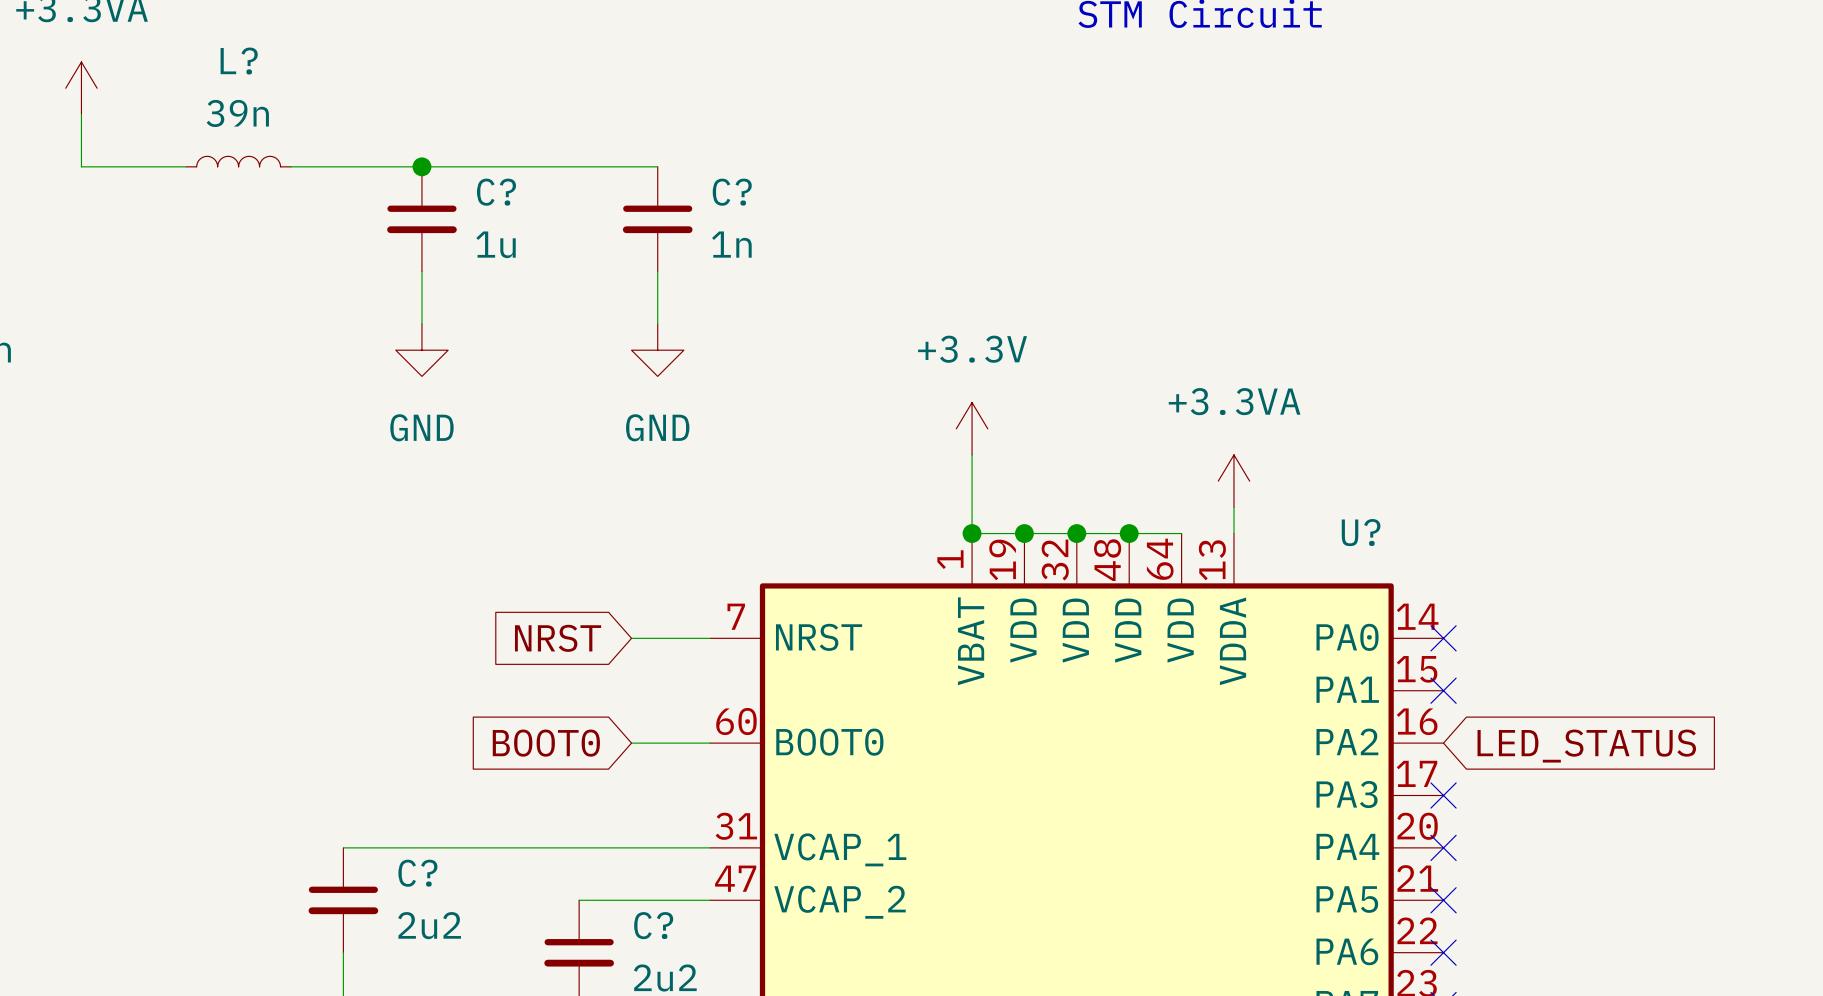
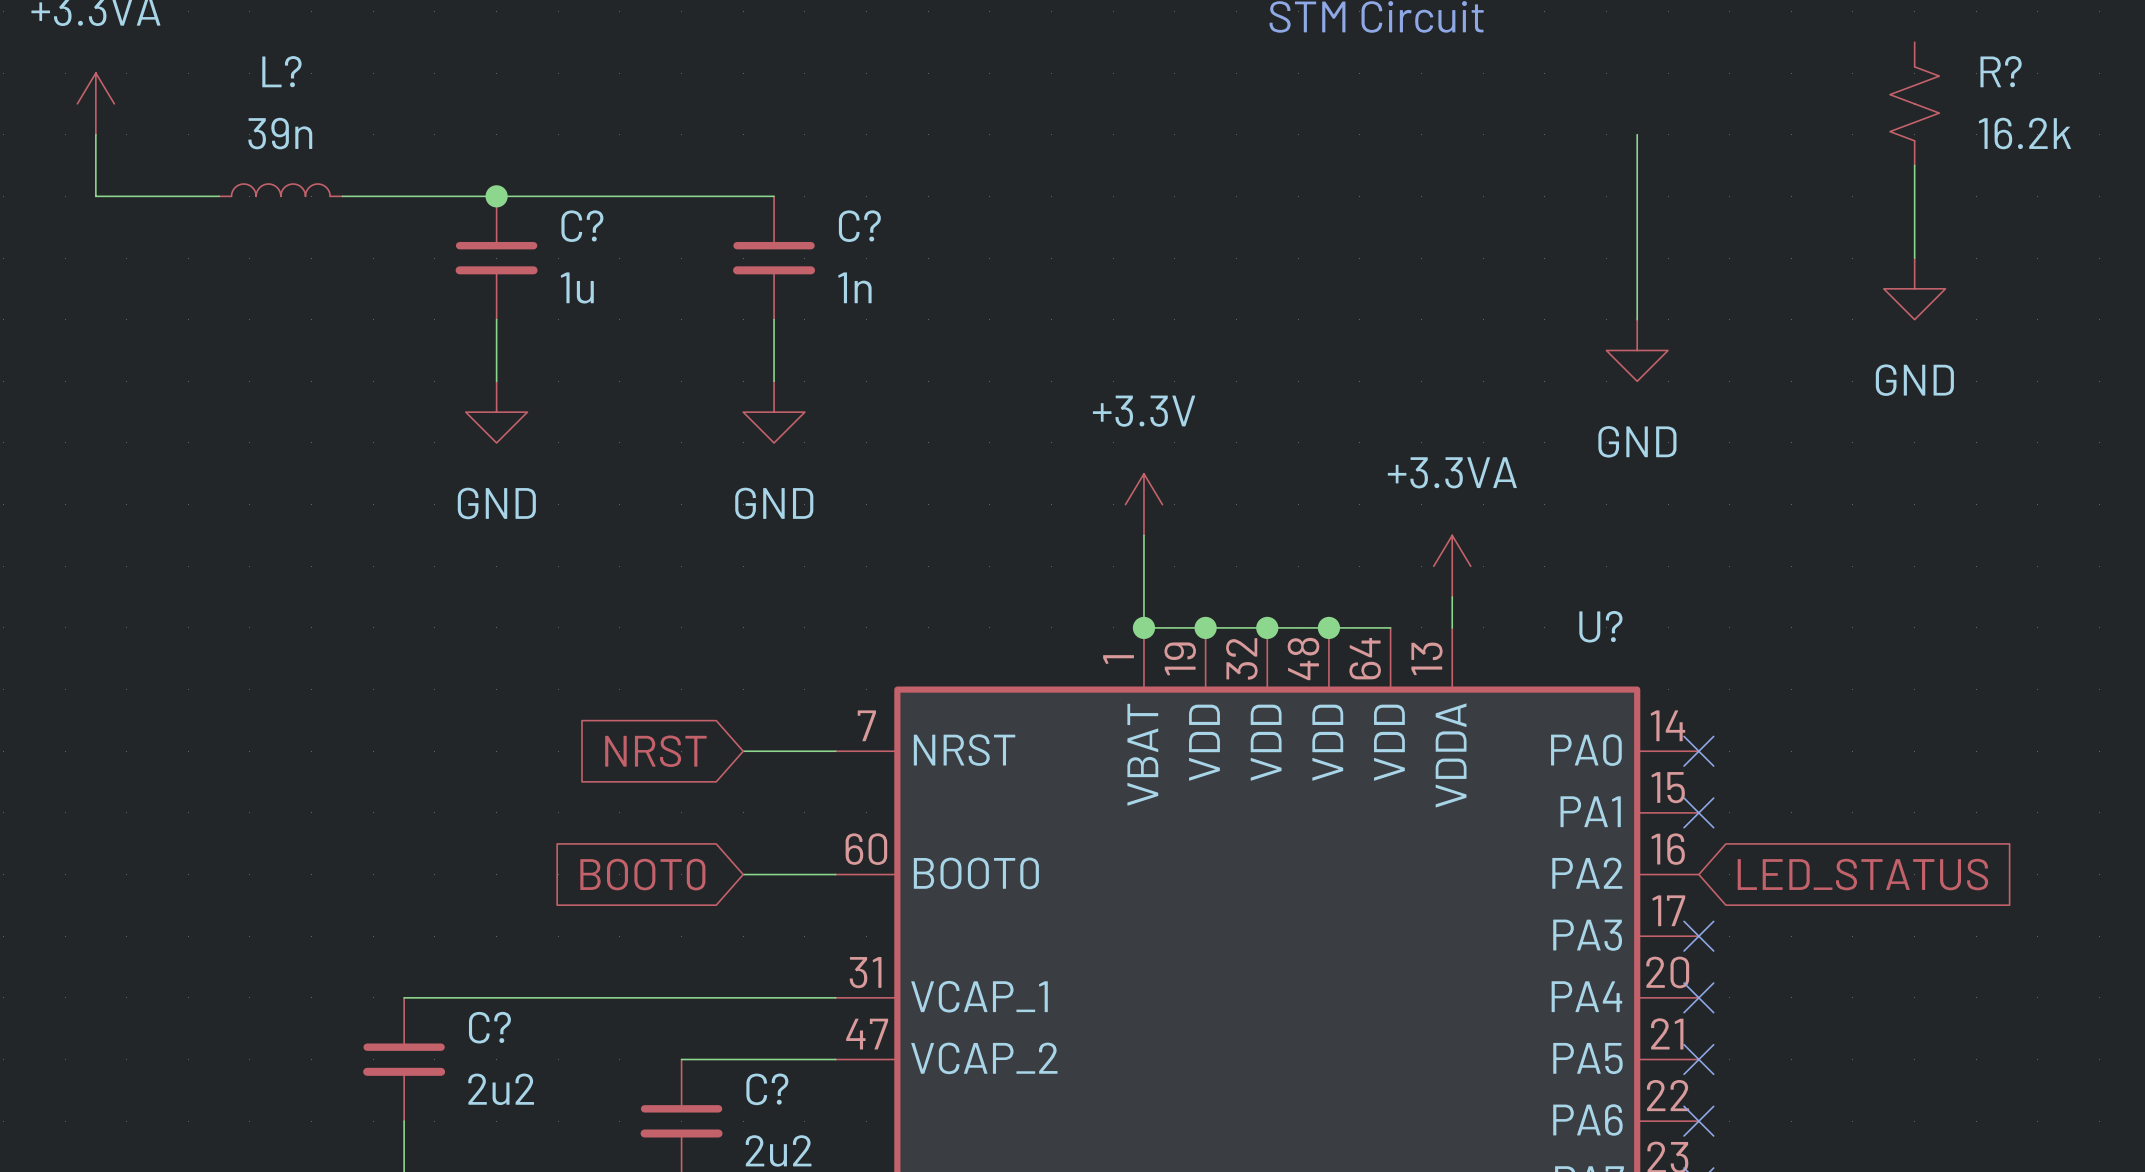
R?: none -> 16.2k (1914, 103)
wire: none -> (1637, 134) (1637, 319)
wire: none -> (1914, 165) (1914, 258)
power symbol: none -> GND (1914, 288)
power symbol: none -> GND (1637, 350)

